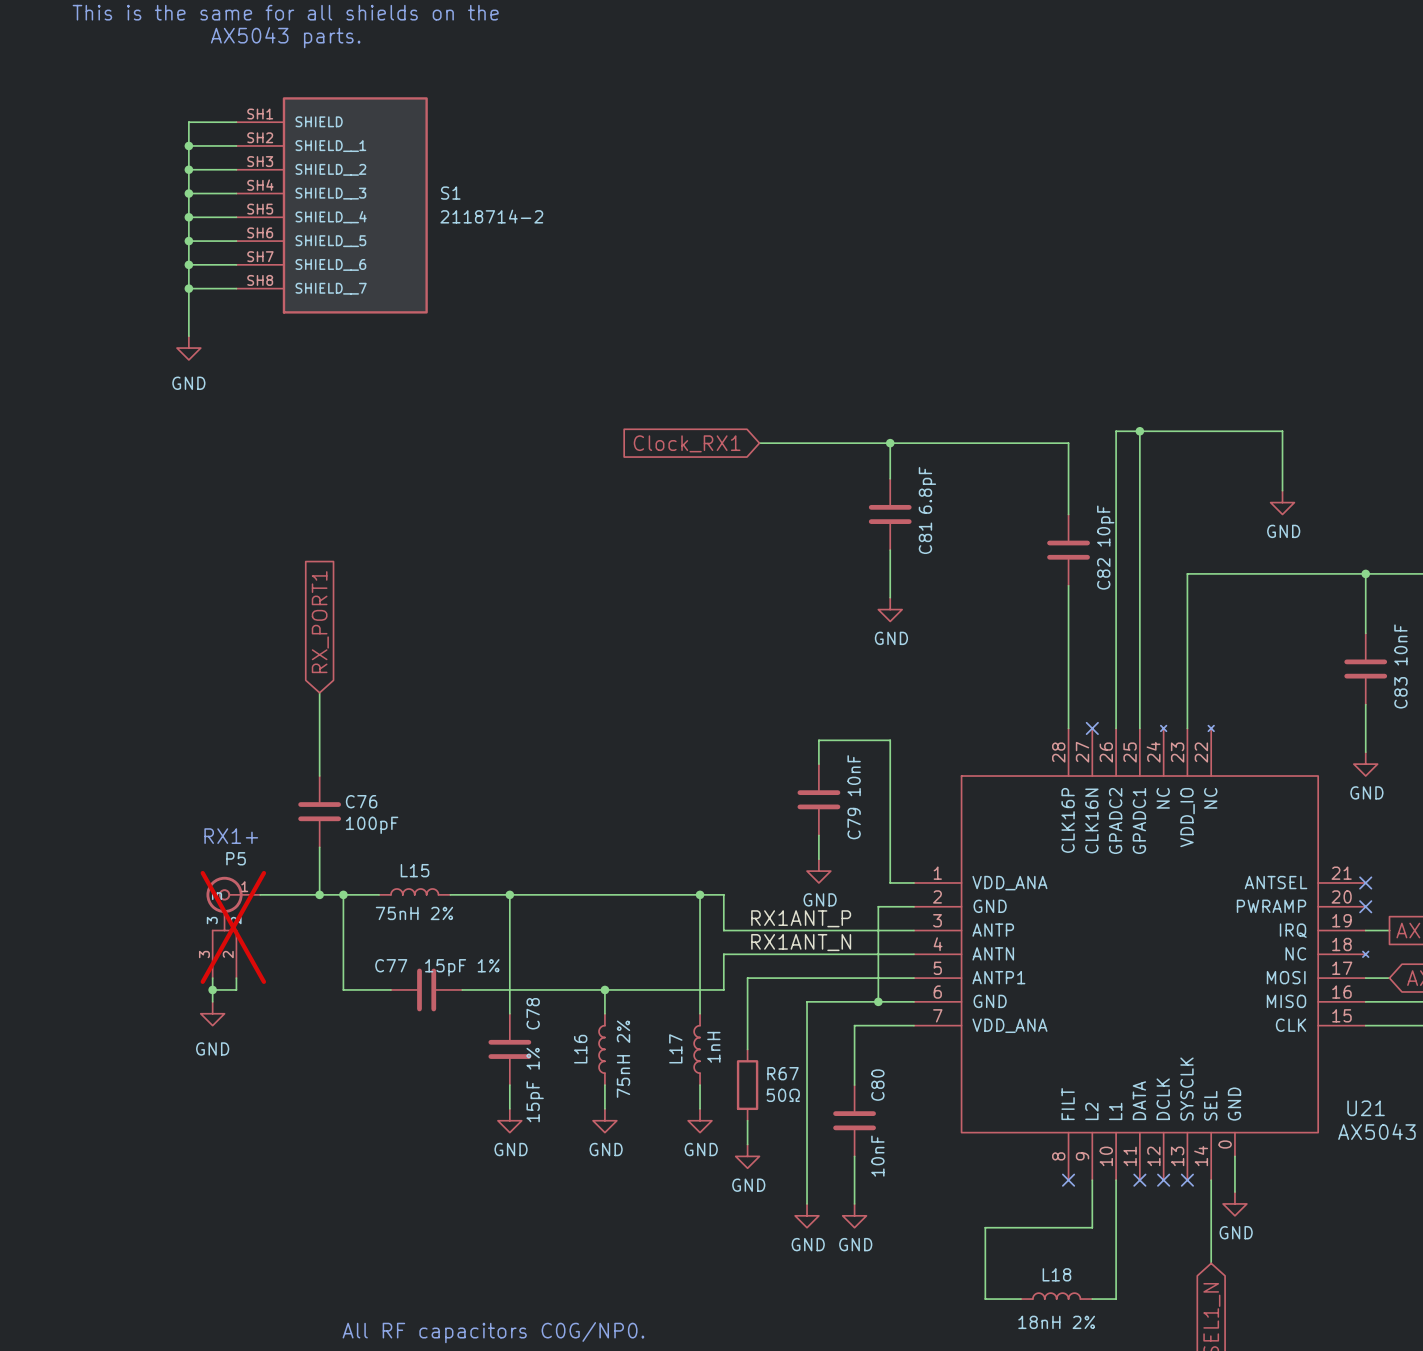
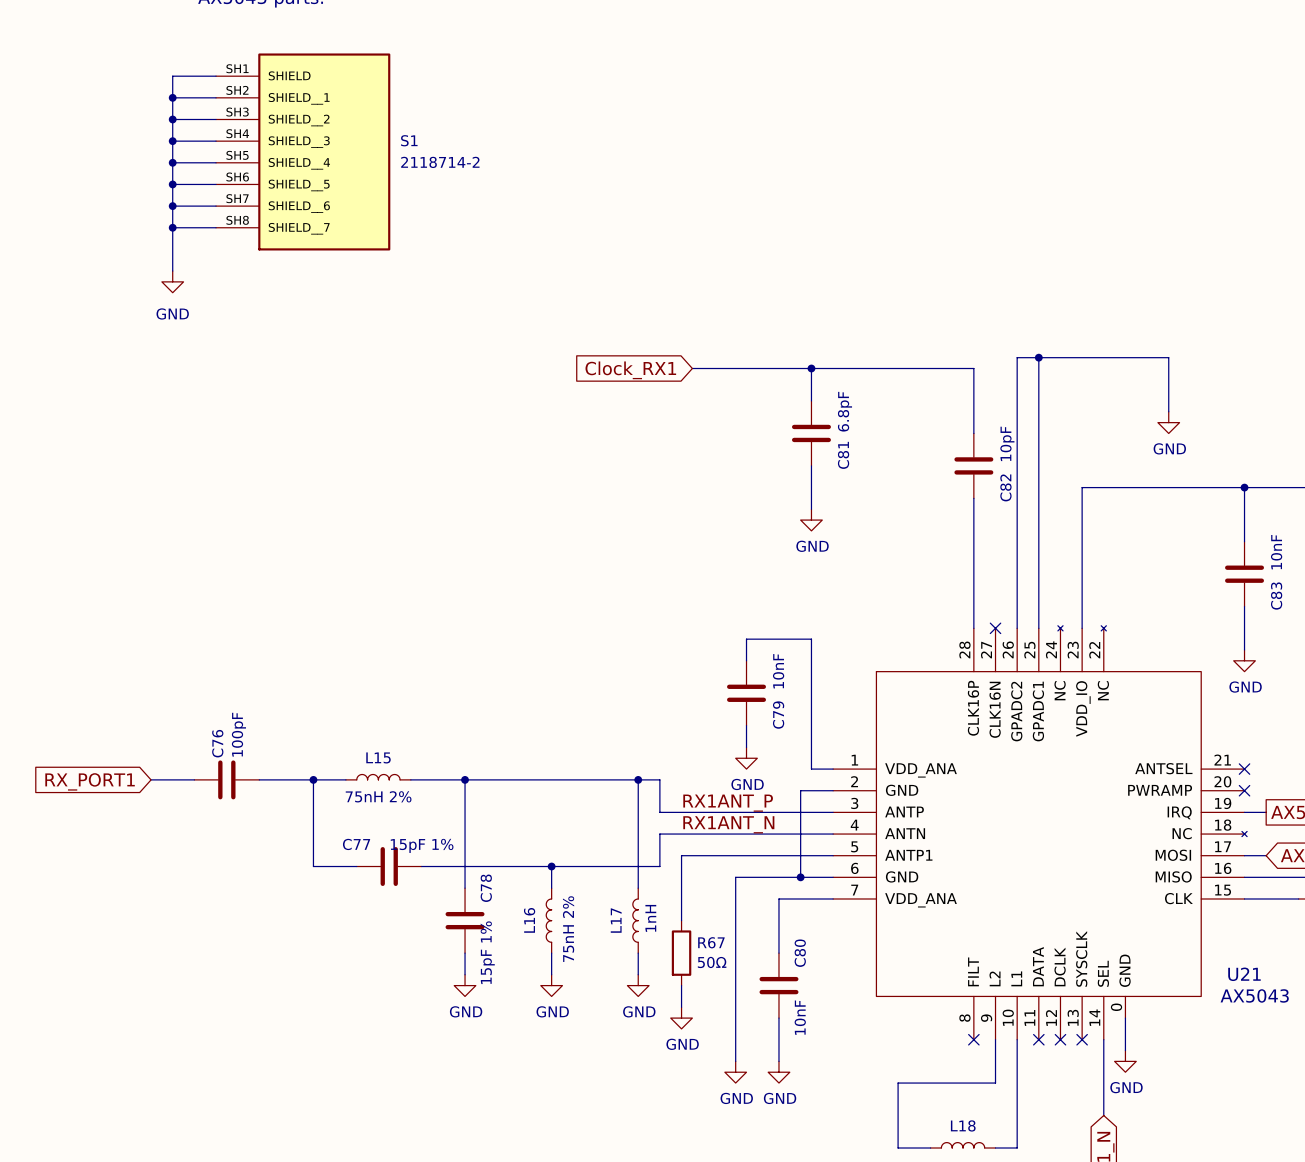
global label: RX_PORT1 (320, 622) -> none
wire: (319, 692) (319, 776) -> none
C76 name position: C76 (361, 801) -> C76 (217, 743)
C76 rotation: 0° (319, 811) -> 90° clockwise (226, 779)
C76 position: (319, 811) -> (226, 779)
C76 value position: 100pF (372, 825) -> 100pF (238, 734)
text: RX1+ (231, 836) -> none
wire: (319, 847) (319, 894) -> none
wire: none -> (151, 779) (194, 779)
junction: (319, 894) -> none
global label: none -> RX_PORT1 (90, 781)
P5: (233, 927) -> none
wire: (212, 978) (212, 1001) -> none
wire: (236, 978) (236, 989) (212, 989) -> none
junction: (212, 989) -> none
power symbol: GND (212, 1013) -> none

